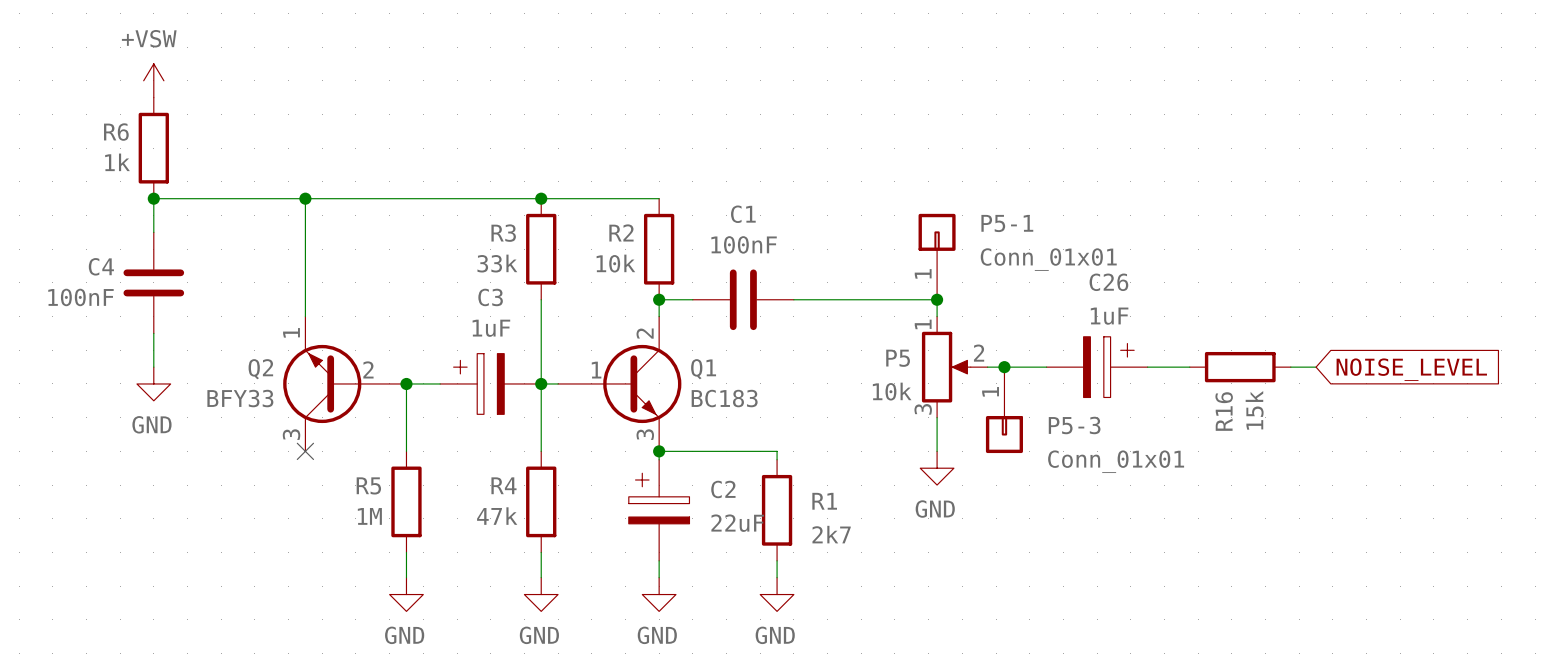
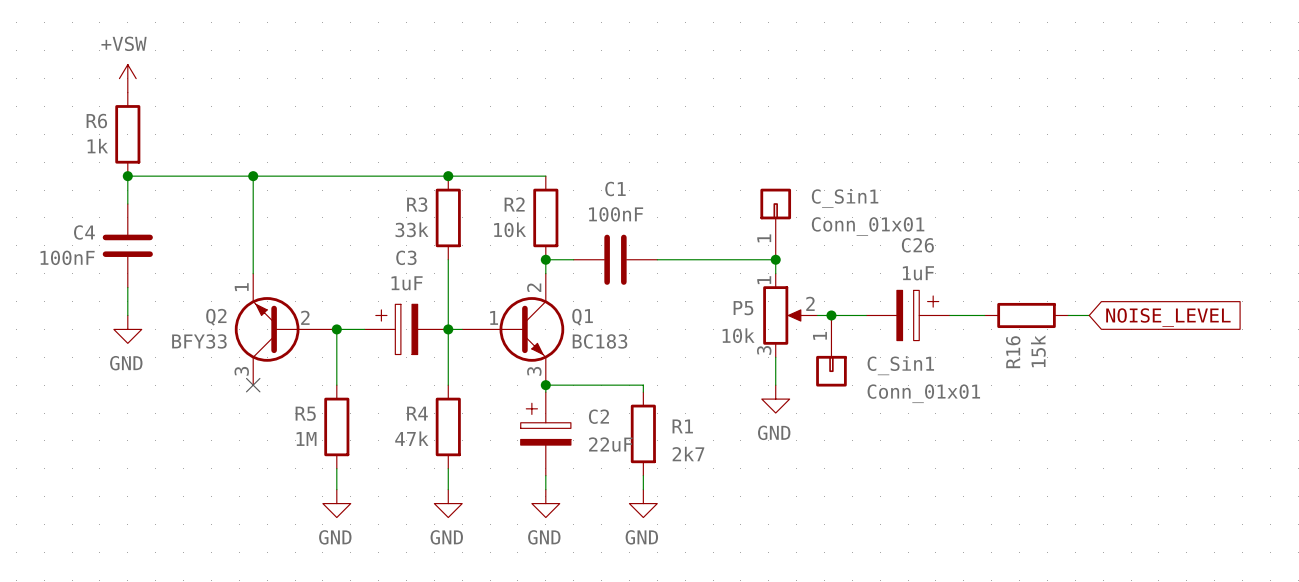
P5-1 name: P5-1 (1007, 223) -> C_Sin1 (845, 198)
P5-3 name: P5-3 (1074, 425) -> C_Sin1 (900, 365)

